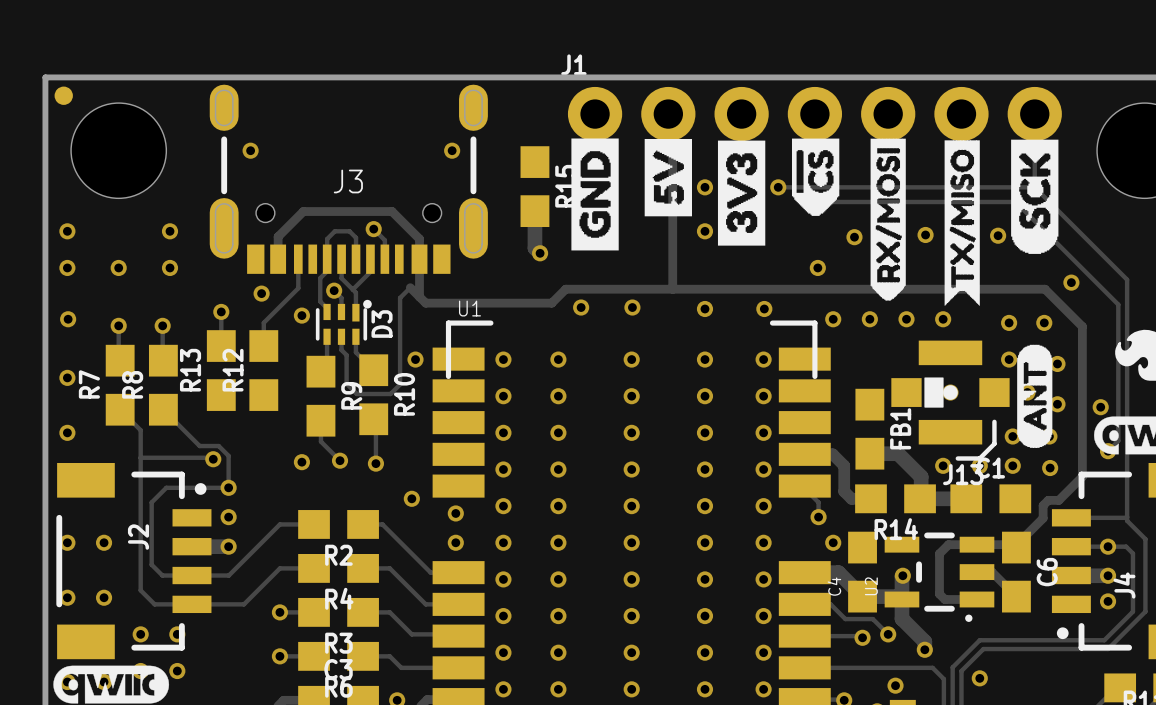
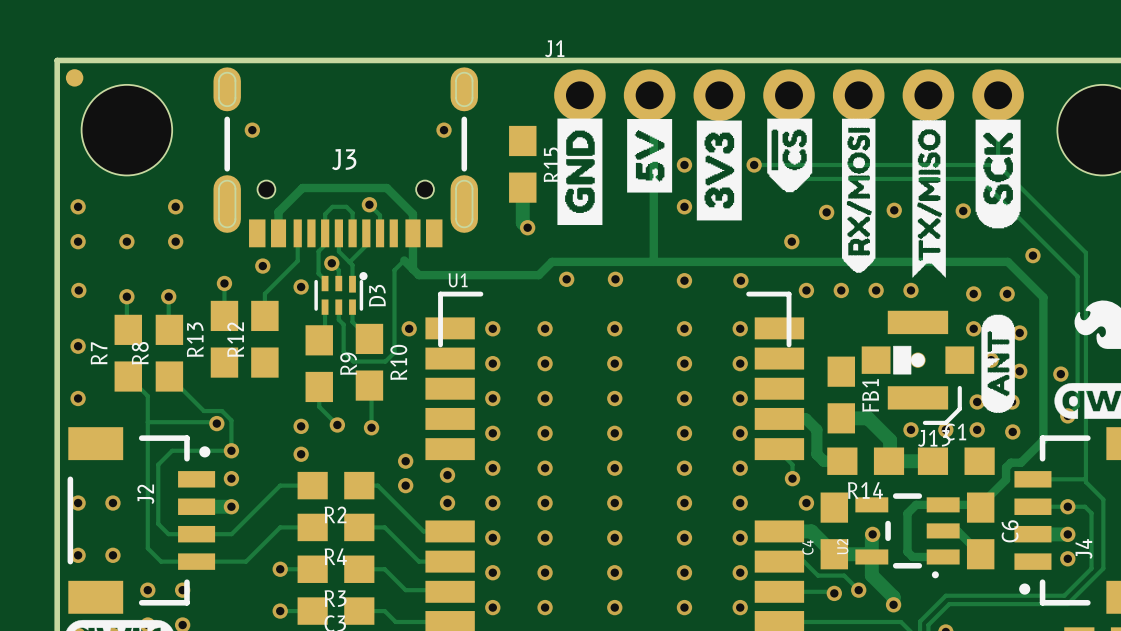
via: none -> (301, 454)
via: none -> (405, 485)

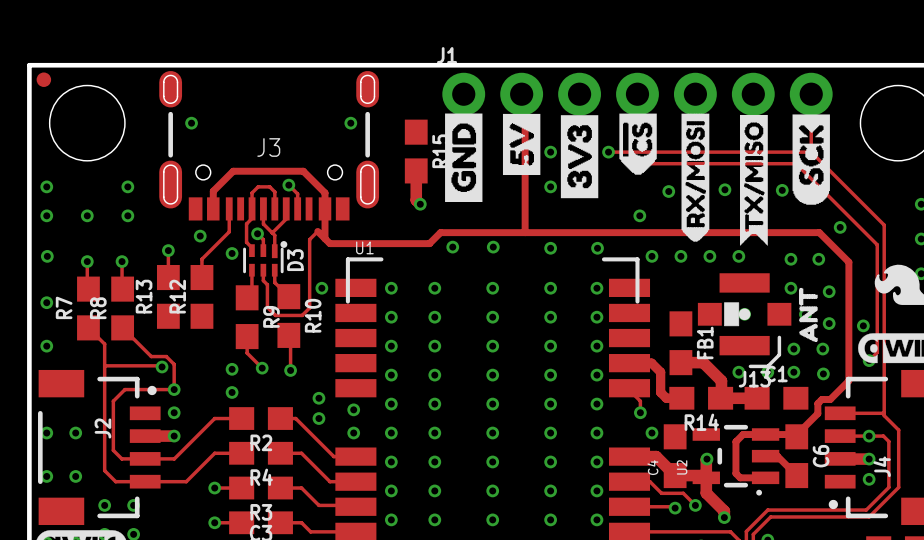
drawing shape: [981, 314, 1015, 413] -> [798, 287, 818, 342]

